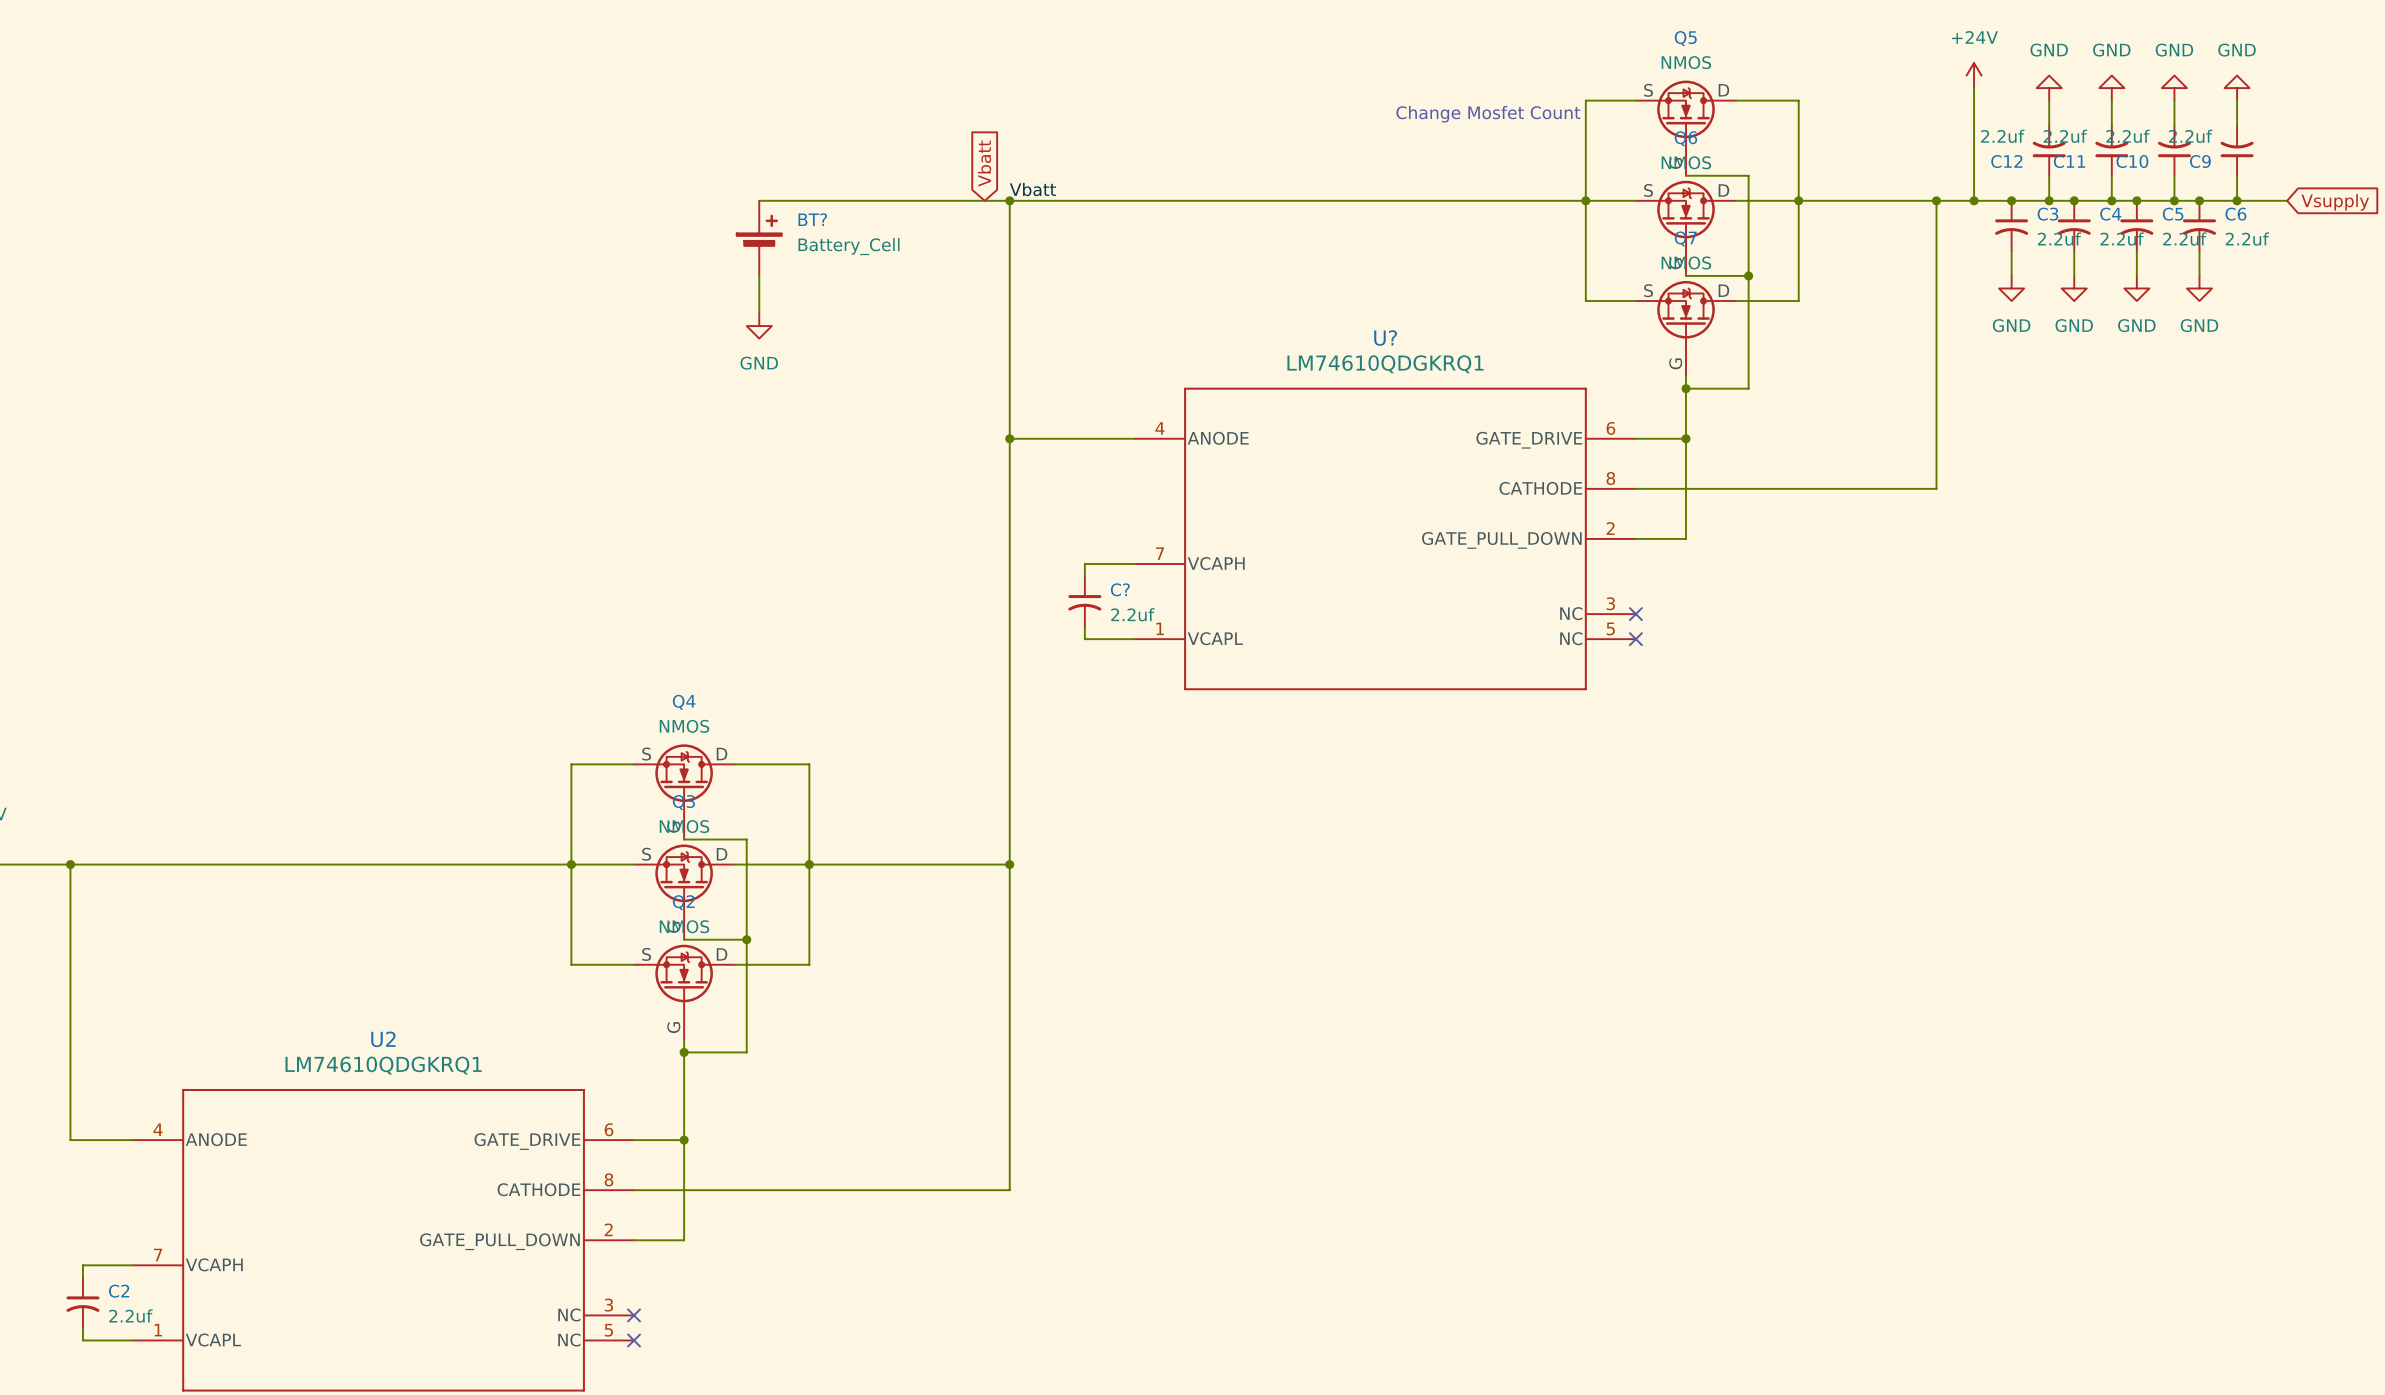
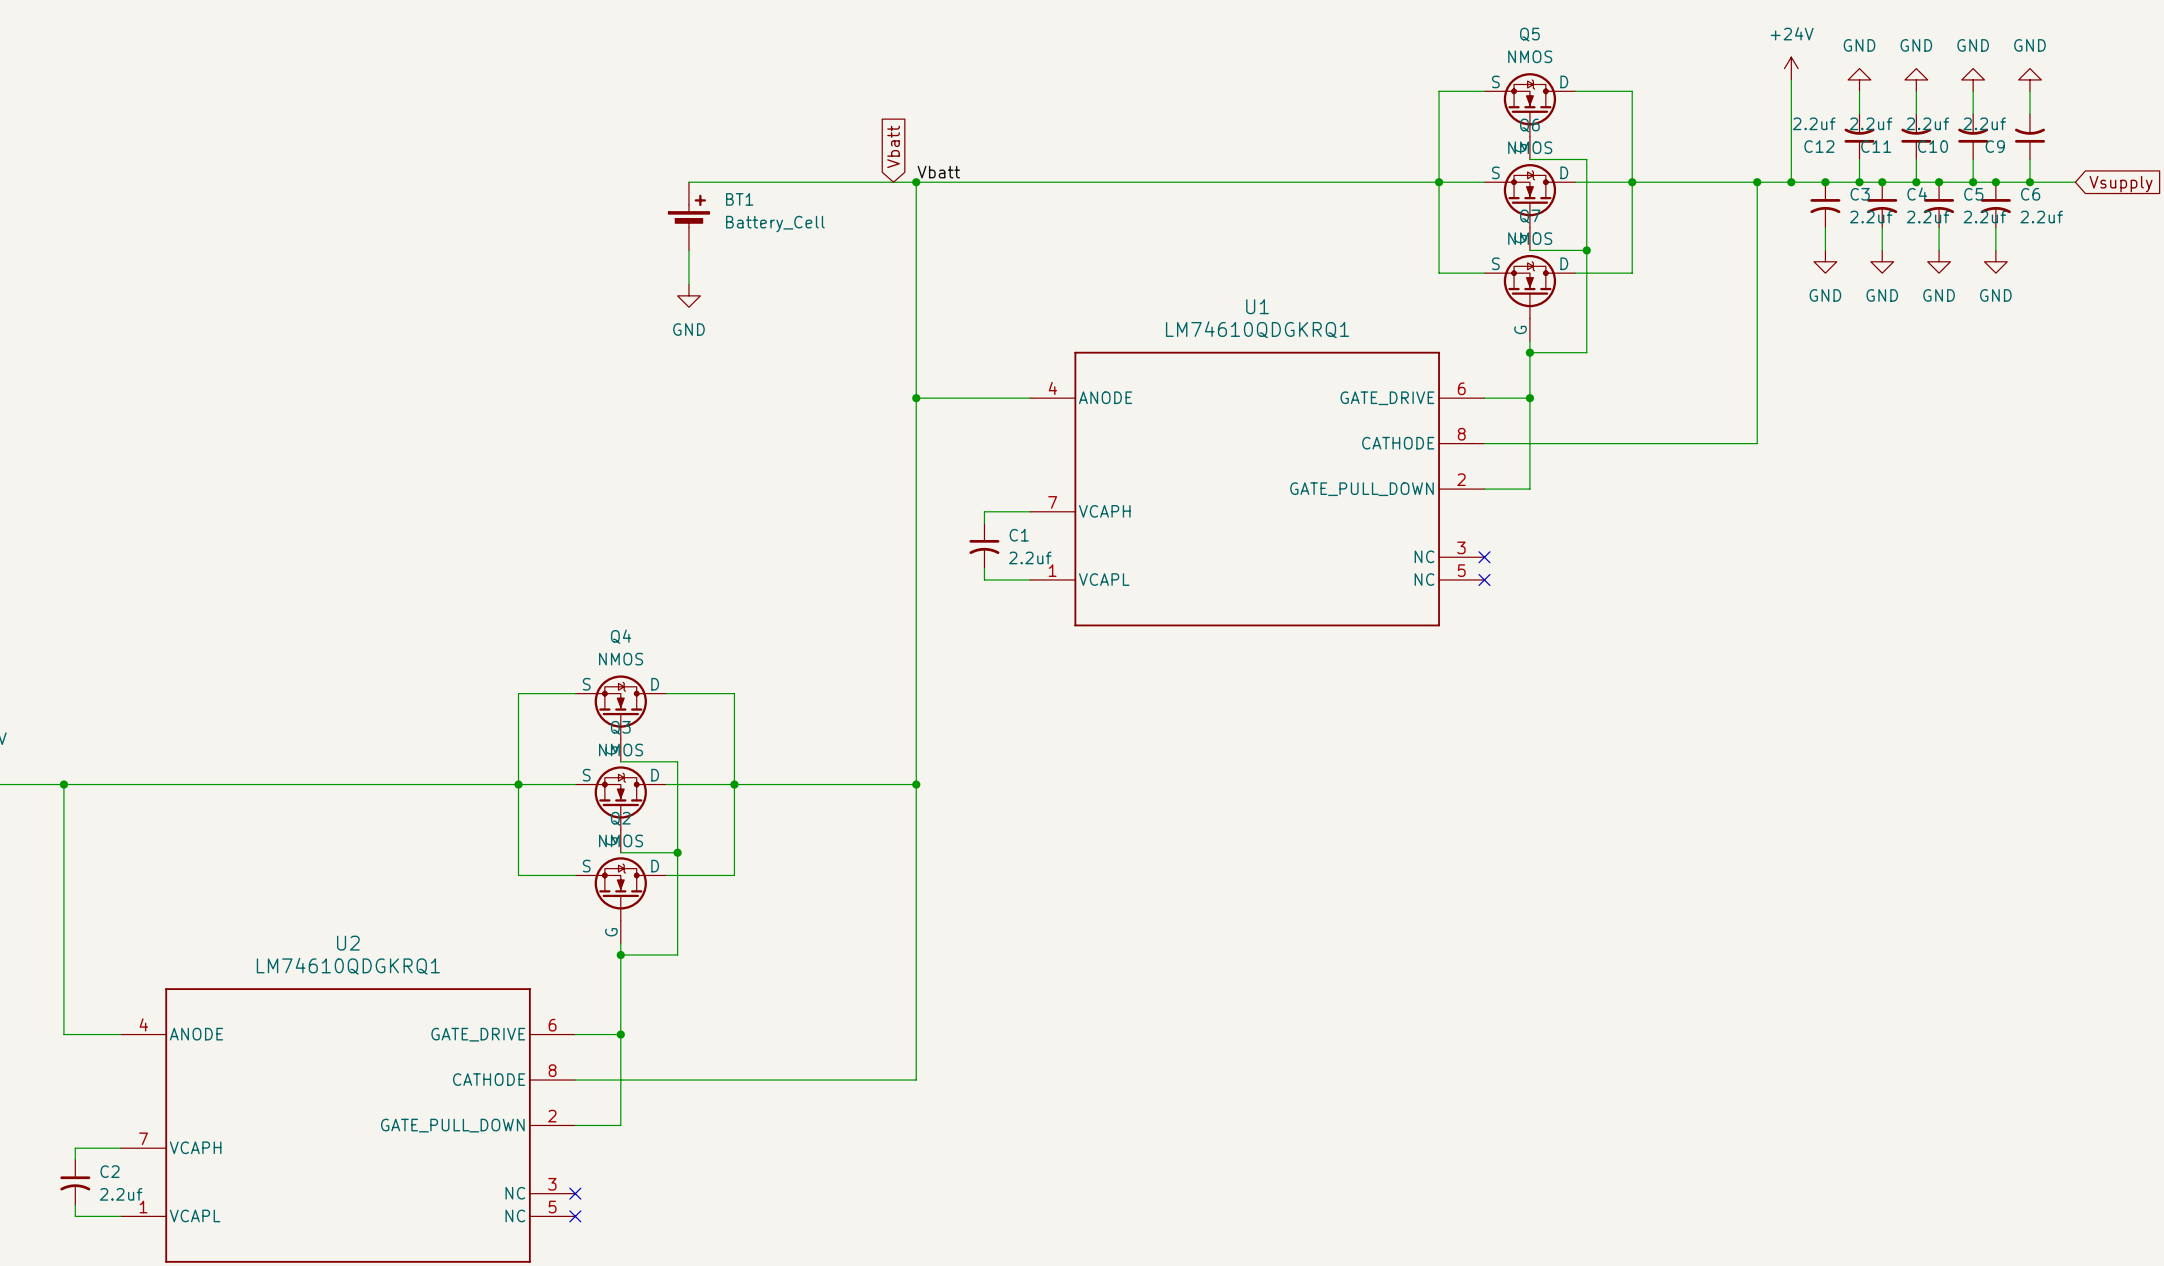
text: Change Mosfet Count (1488, 114) -> none
BT? name: BT? (812, 219) -> BT1 (739, 199)
U? name: U? (1385, 338) -> U1 (1257, 306)
C? name: C? (1120, 589) -> C1 (1019, 535)

